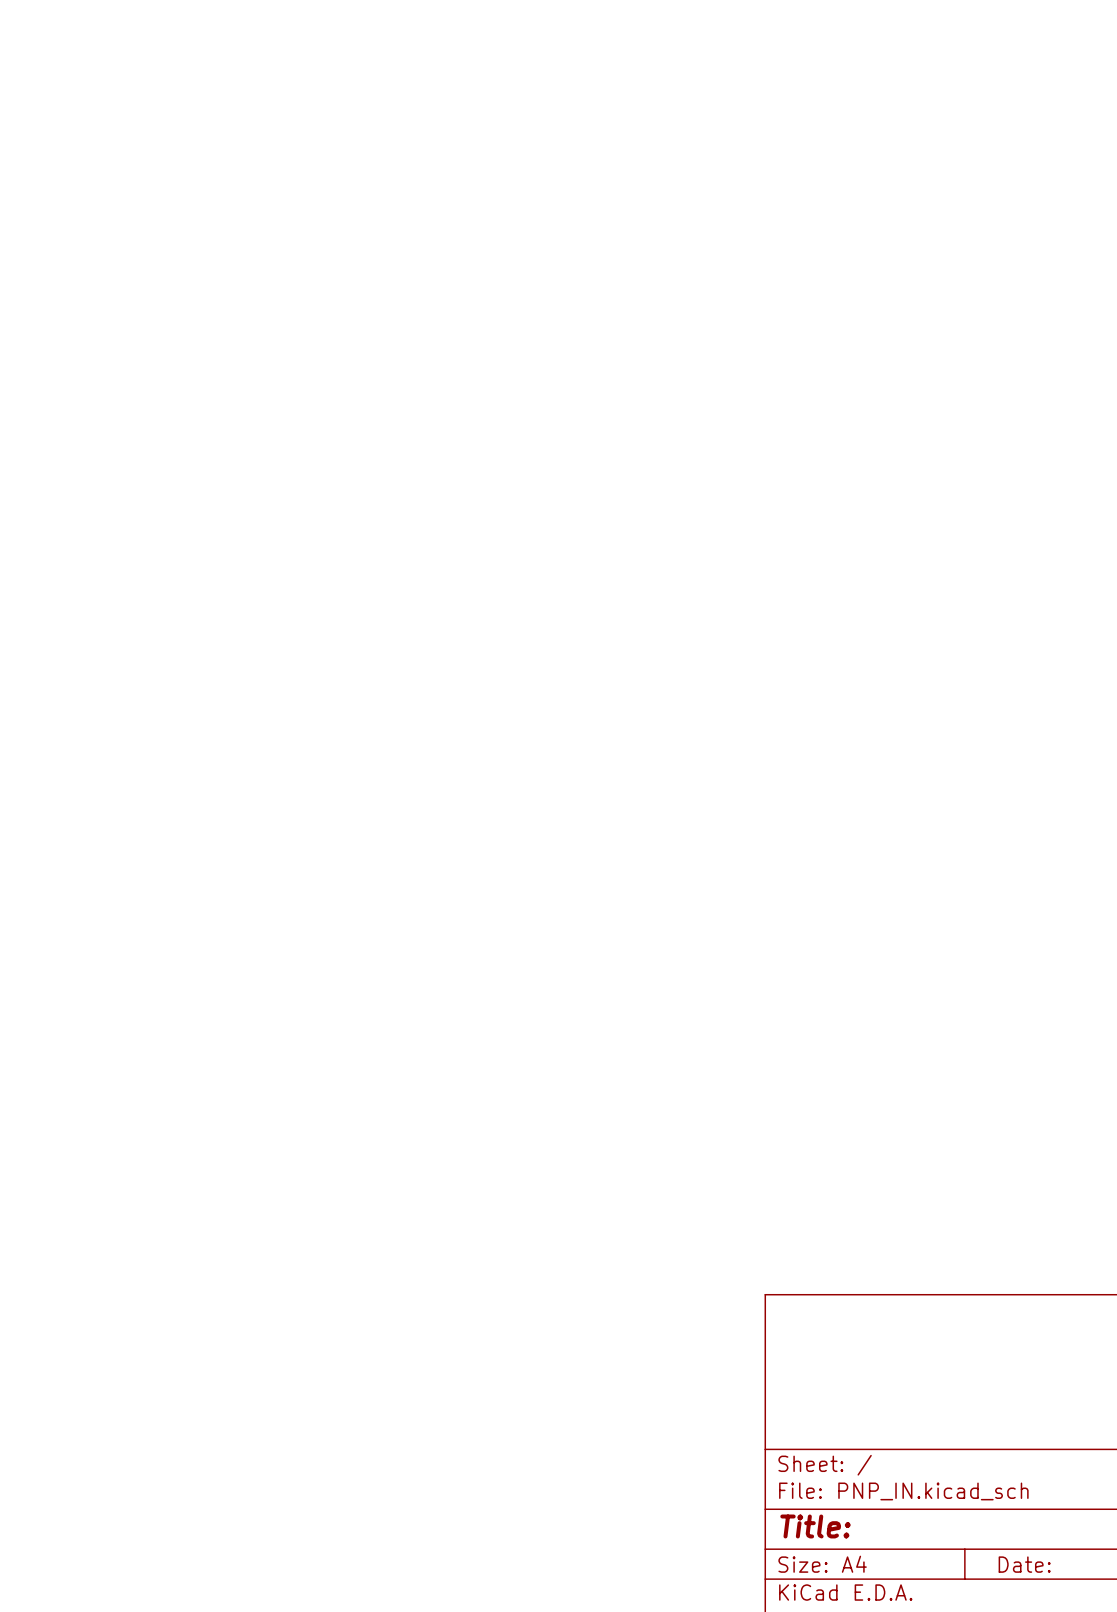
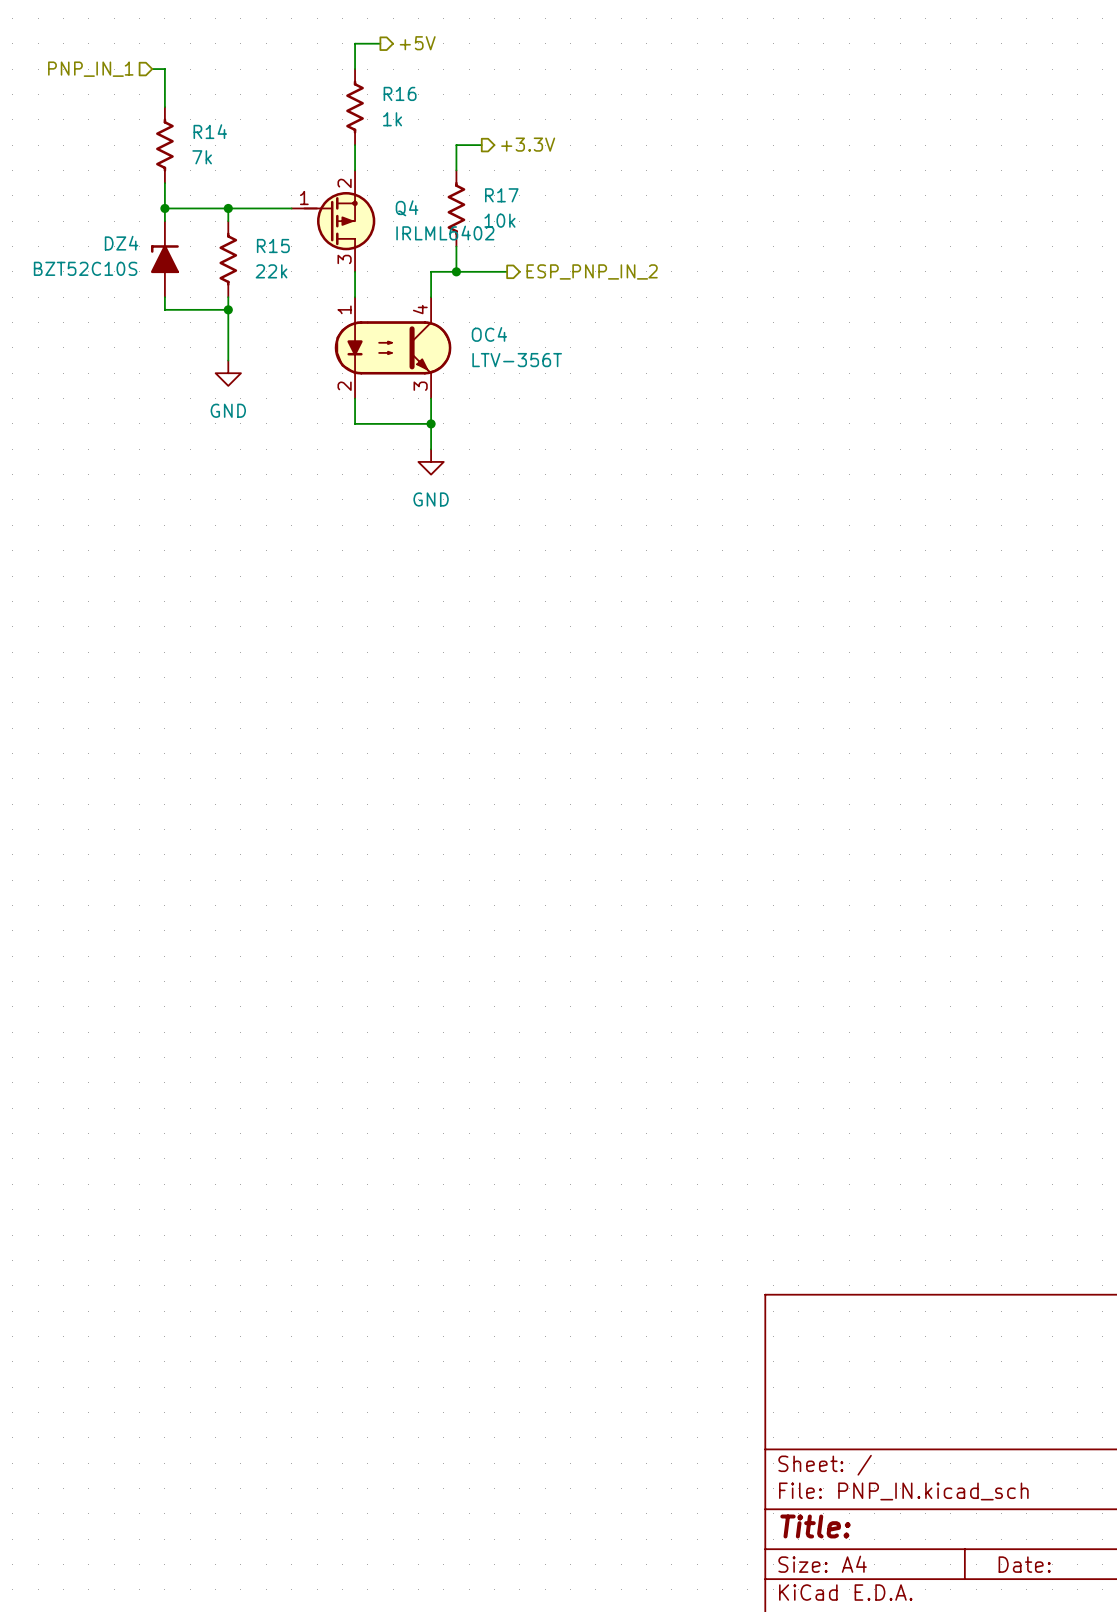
wire: none -> (380, 43) (355, 43) (355, 69)
hierarchical label: none -> +5V (417, 43)
hierarchical label: none -> PNP_IN_1 (90, 69)
wire: none -> (152, 69) (164, 69) (164, 107)
R16: none -> 1k (355, 107)
hierarchical label: none -> +3.3V (528, 144)
R14: none -> 7k (164, 145)
wire: none -> (355, 145) (355, 170)
wire: none -> (481, 145) (456, 145) (456, 170)
wire: none -> (164, 183) (164, 221)
wire: none -> (164, 208) (291, 208)
junction: none -> (164, 208)
wire: none -> (228, 208) (228, 221)
junction: none -> (228, 208)
R17: none -> 10k (456, 208)
Q4: none -> IRLML6402 (333, 221)
wire: none -> (456, 246) (456, 271)
DZ4: none -> BZT52C10S (164, 259)
R15: none -> 22k (228, 259)
wire: none -> (355, 271) (355, 297)
junction: none -> (456, 271)
wire: none -> (507, 271) (431, 271) (431, 297)
hierarchical label: none -> ESP_PNP_IN_2 (592, 271)
wire: none -> (164, 297) (164, 309) (228, 309)
wire: none -> (228, 297) (228, 360)
junction: none -> (228, 309)
OC4: none -> LTV-356T (393, 347)
power symbol: none -> GND (228, 373)
wire: none -> (355, 398) (355, 423) (431, 423)
wire: none -> (431, 398) (431, 449)
junction: none -> (431, 423)
power symbol: none -> GND (431, 461)

